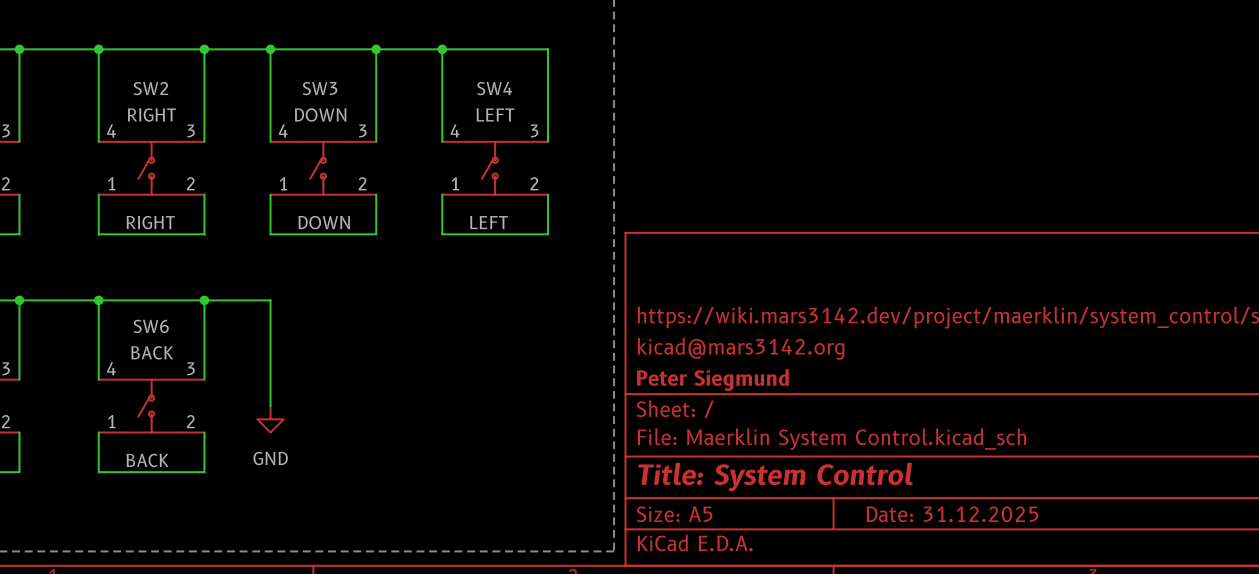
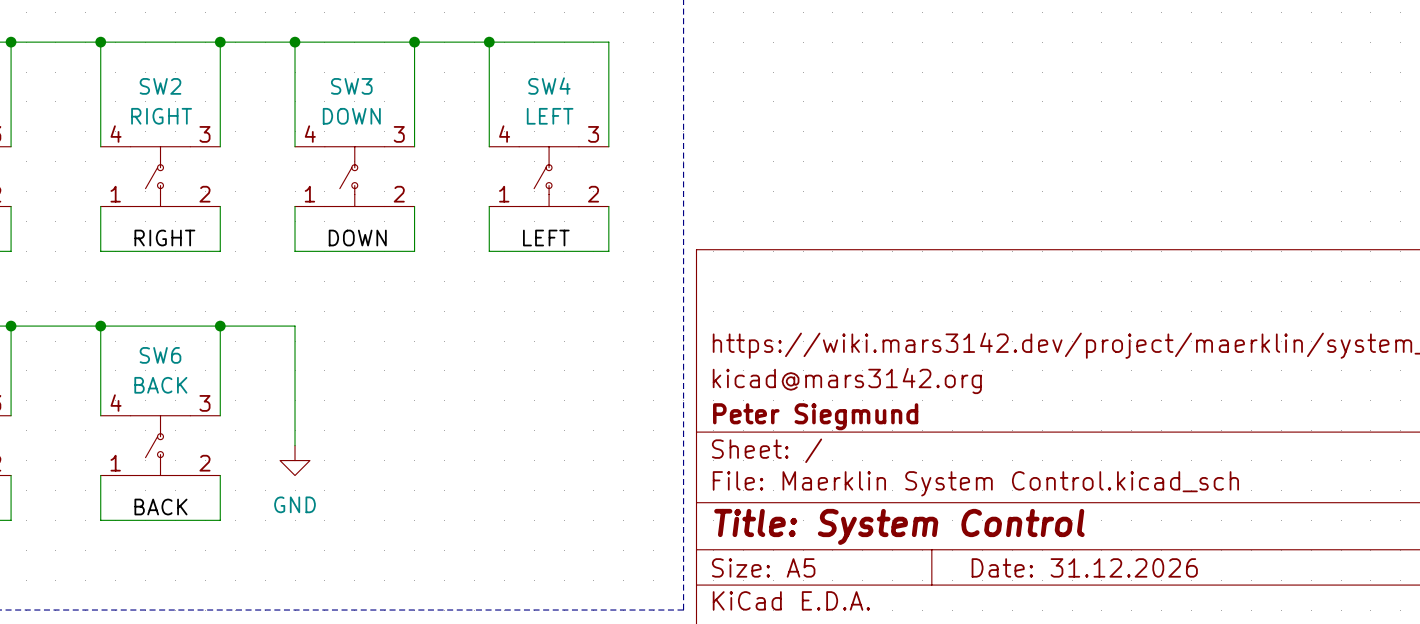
title block: Date: 31.12.2025 (952, 514) -> Date: 31.12.2026 (1084, 567)

